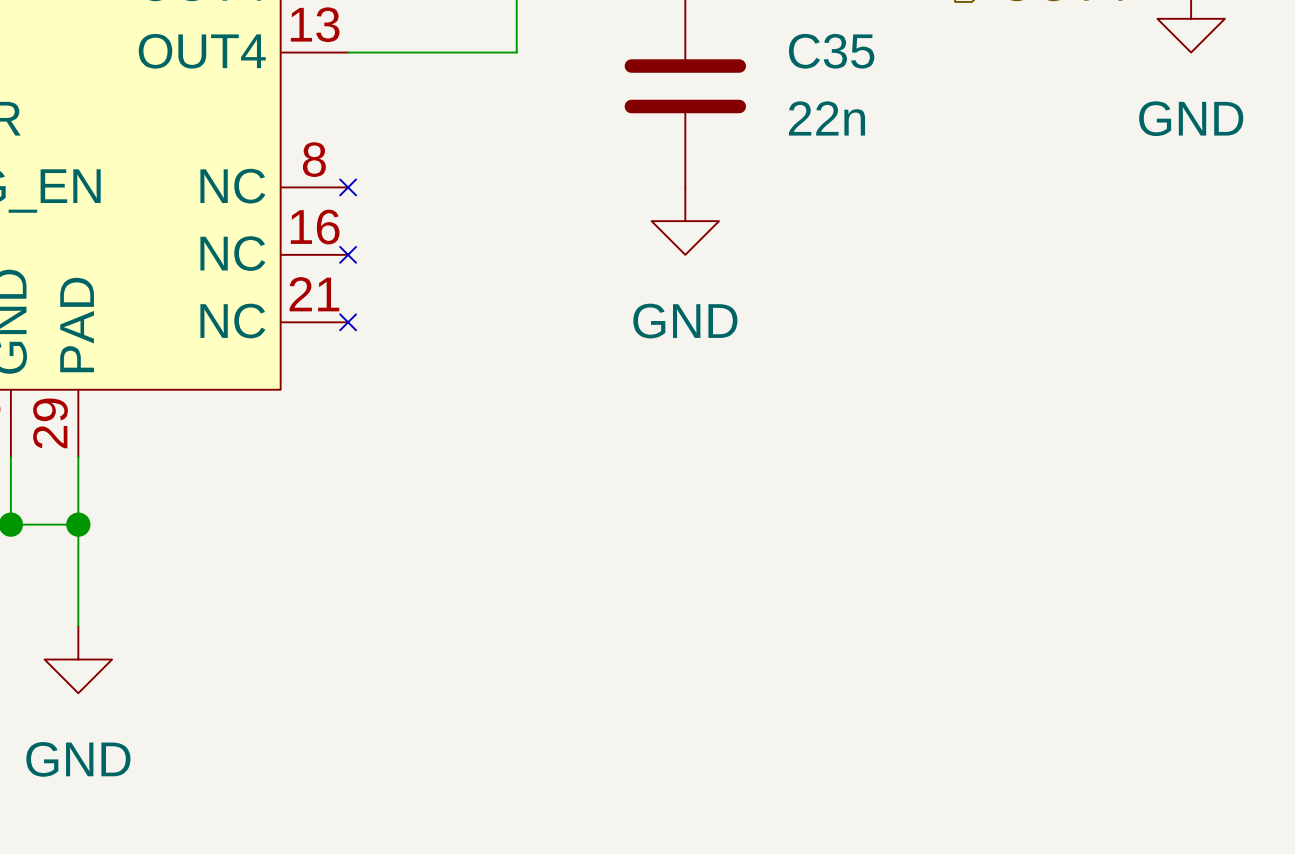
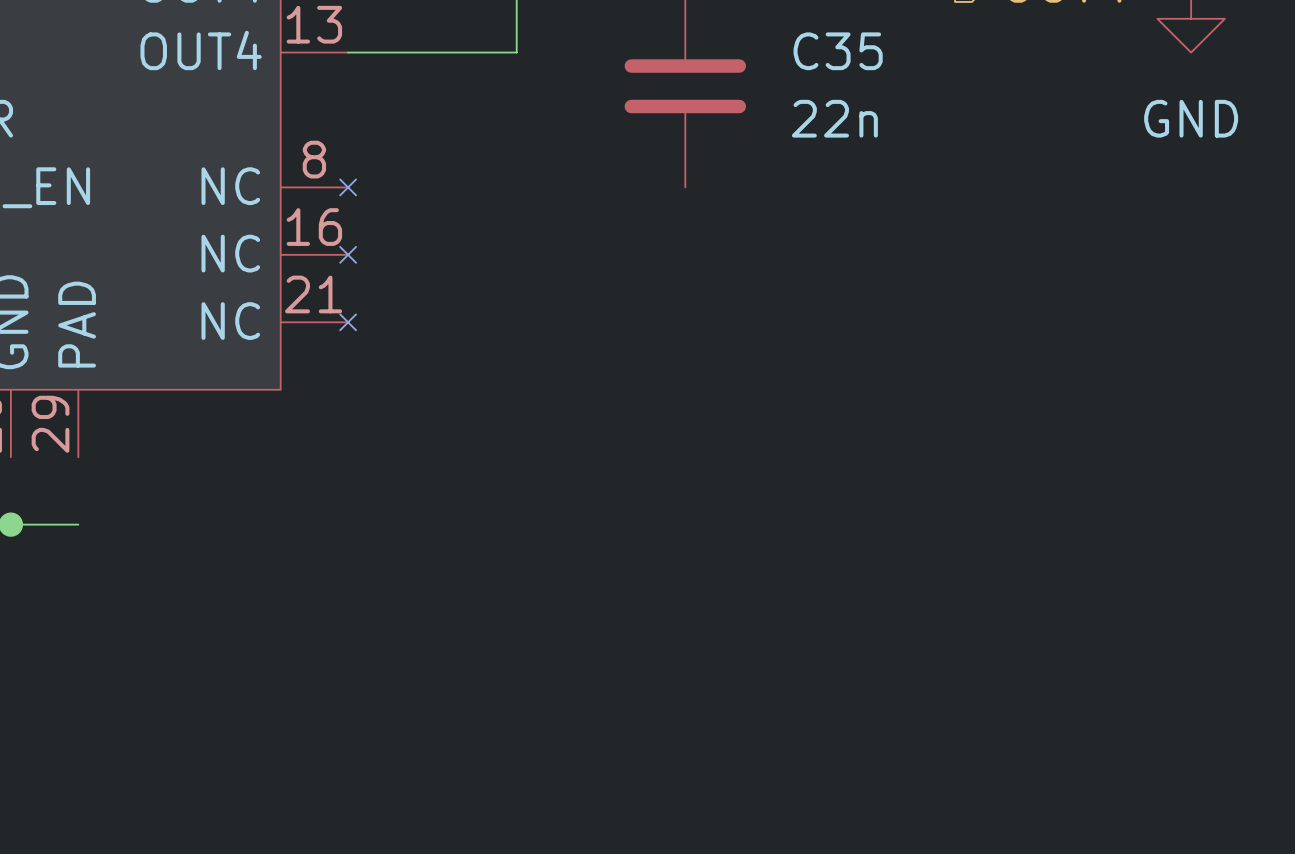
power symbol: GND (685, 221) -> none
wire: (10, 457) (10, 524) -> none
wire: (78, 457) (78, 625) -> none
junction: (78, 524) -> none
power symbol: GND (78, 659) -> none

